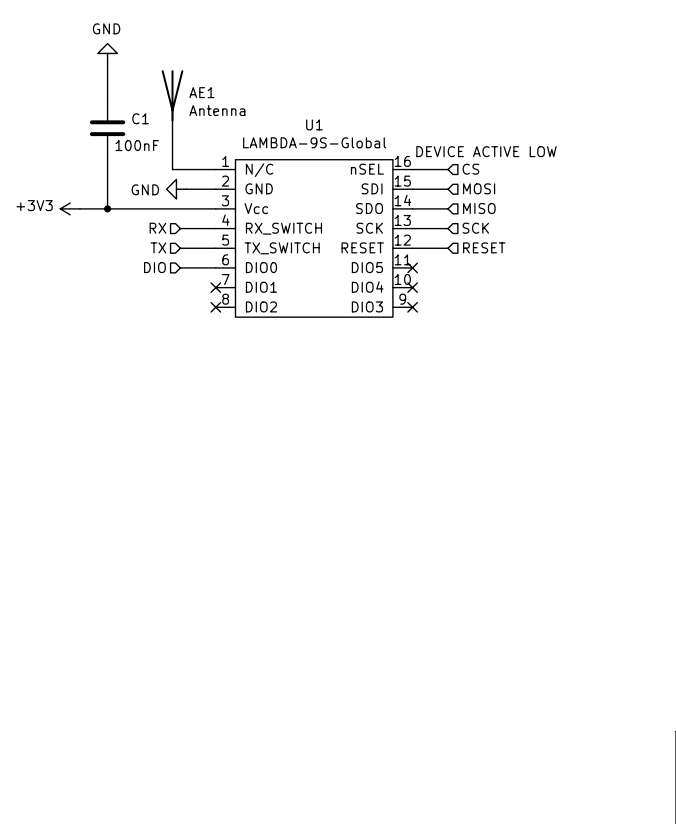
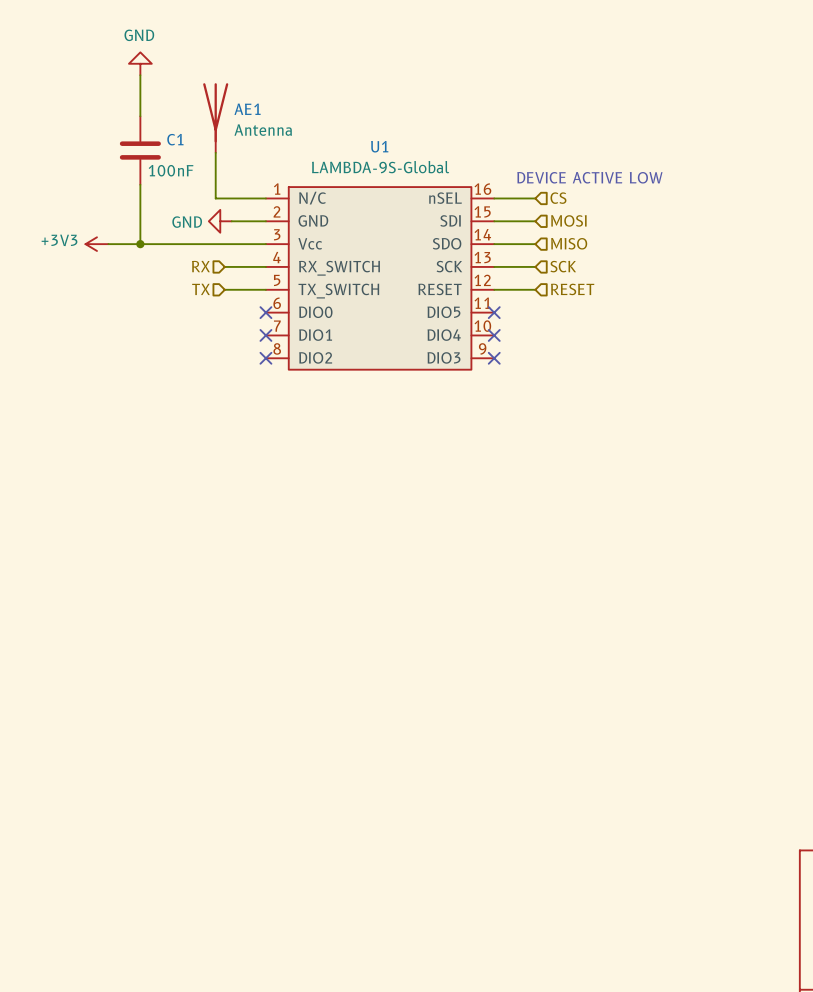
hierarchical label: DIO (154, 267) -> none
wire: (180, 267) (215, 267) -> none
no-connect mark: none -> (265, 312)

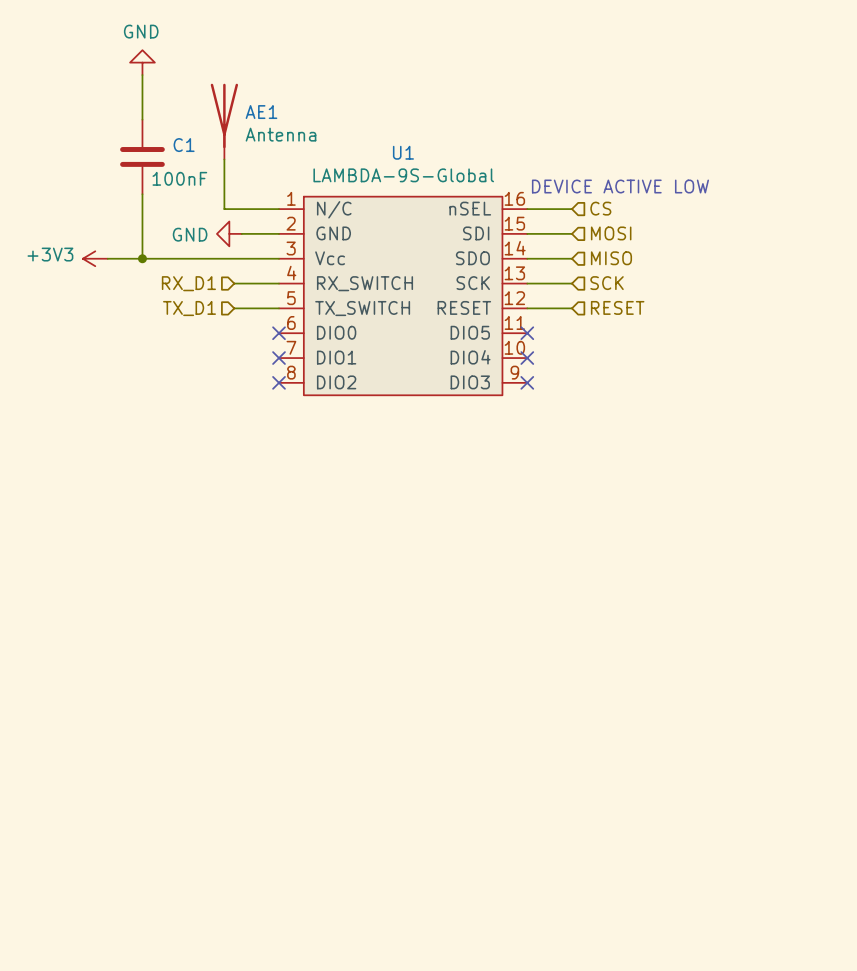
hierarchical label: RX (200, 266) -> RX_D1 (188, 283)
hierarchical label: TX (201, 289) -> TX_D1 (189, 308)

